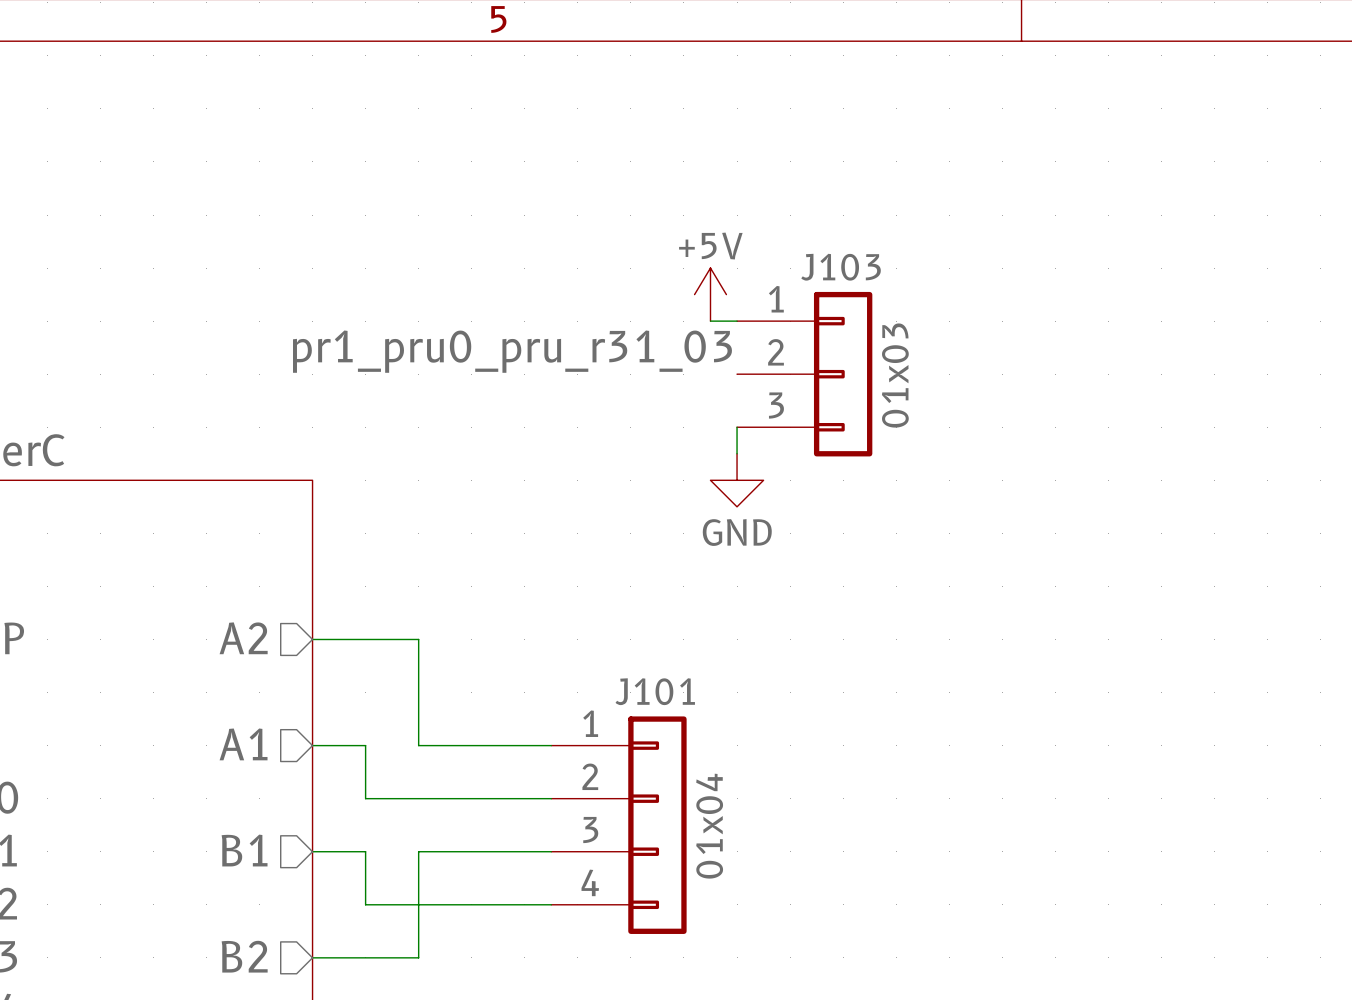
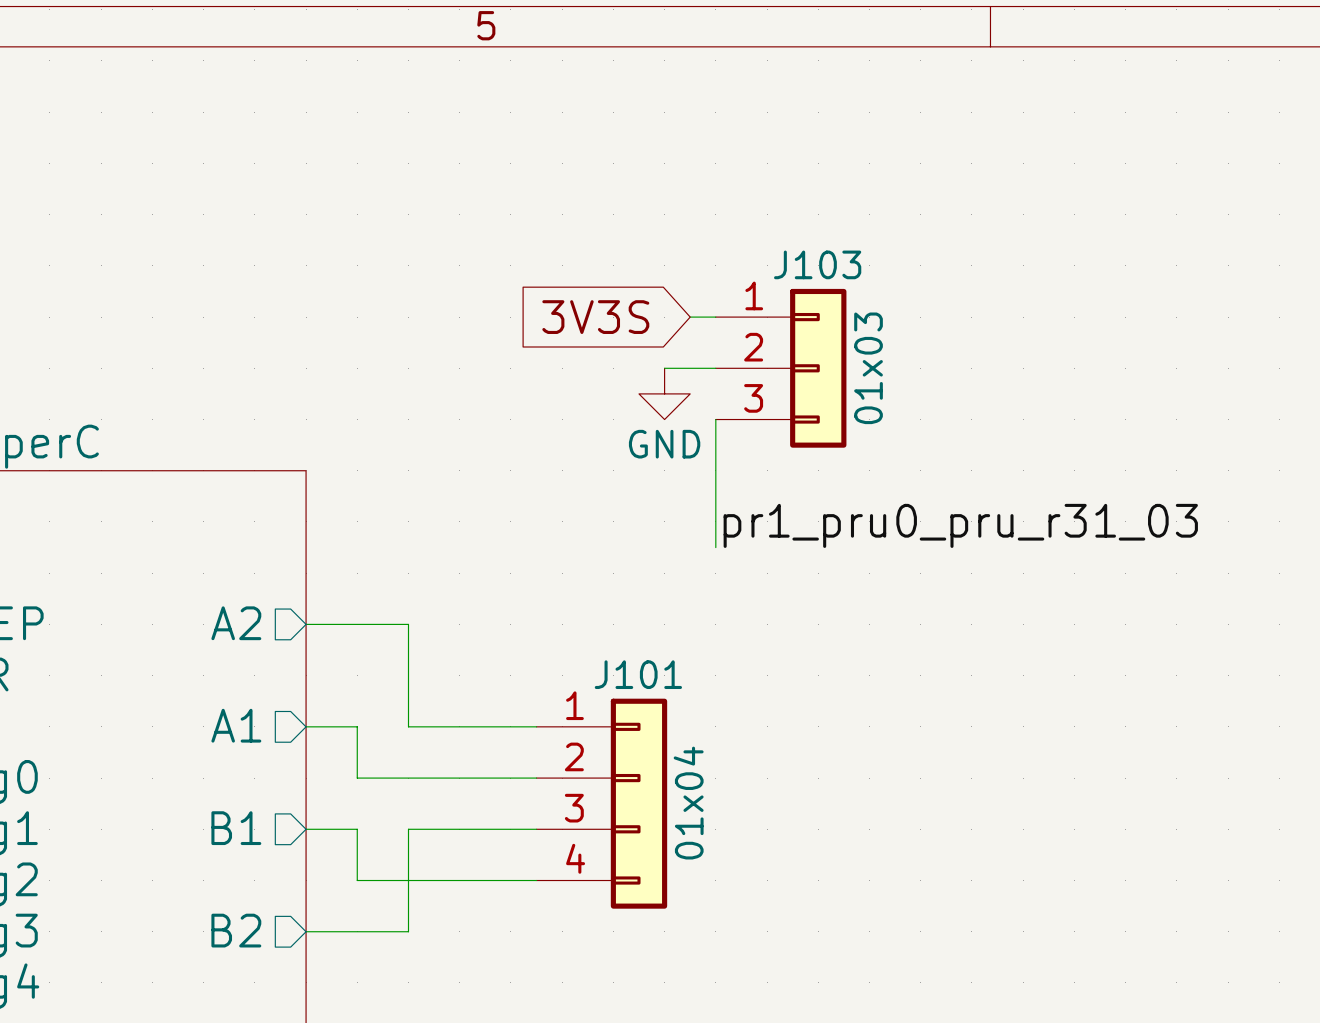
power symbol: +5V (710, 294) -> none
global label: none -> 3V3S (595, 317)
label position: pr1_pru0_pru_r31_03 (512, 351) -> pr1_pru0_pru_r31_03 (960, 525)
wire: none -> (664, 368) (715, 368)
wire: none -> (715, 445) (715, 547)
power symbol position: GND (737, 480) -> GND (664, 393)

